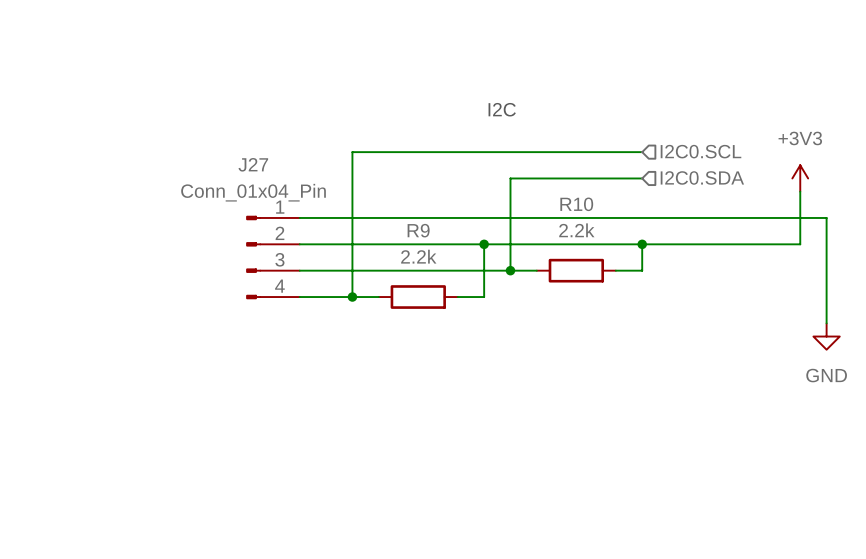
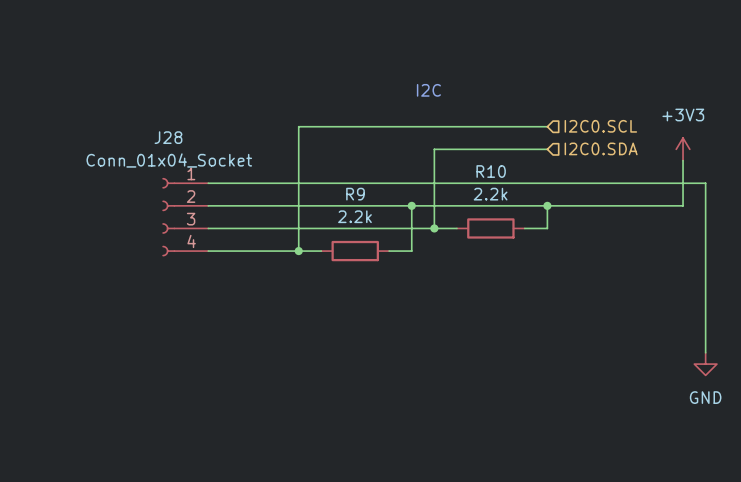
J28: none -> Conn_01x04_Socket (185, 217)
J27: Conn_01x04_Pin (273, 257) -> none
wire: none -> (705, 273) (705, 352)
power symbol position: GND (826, 336) -> GND (705, 364)

